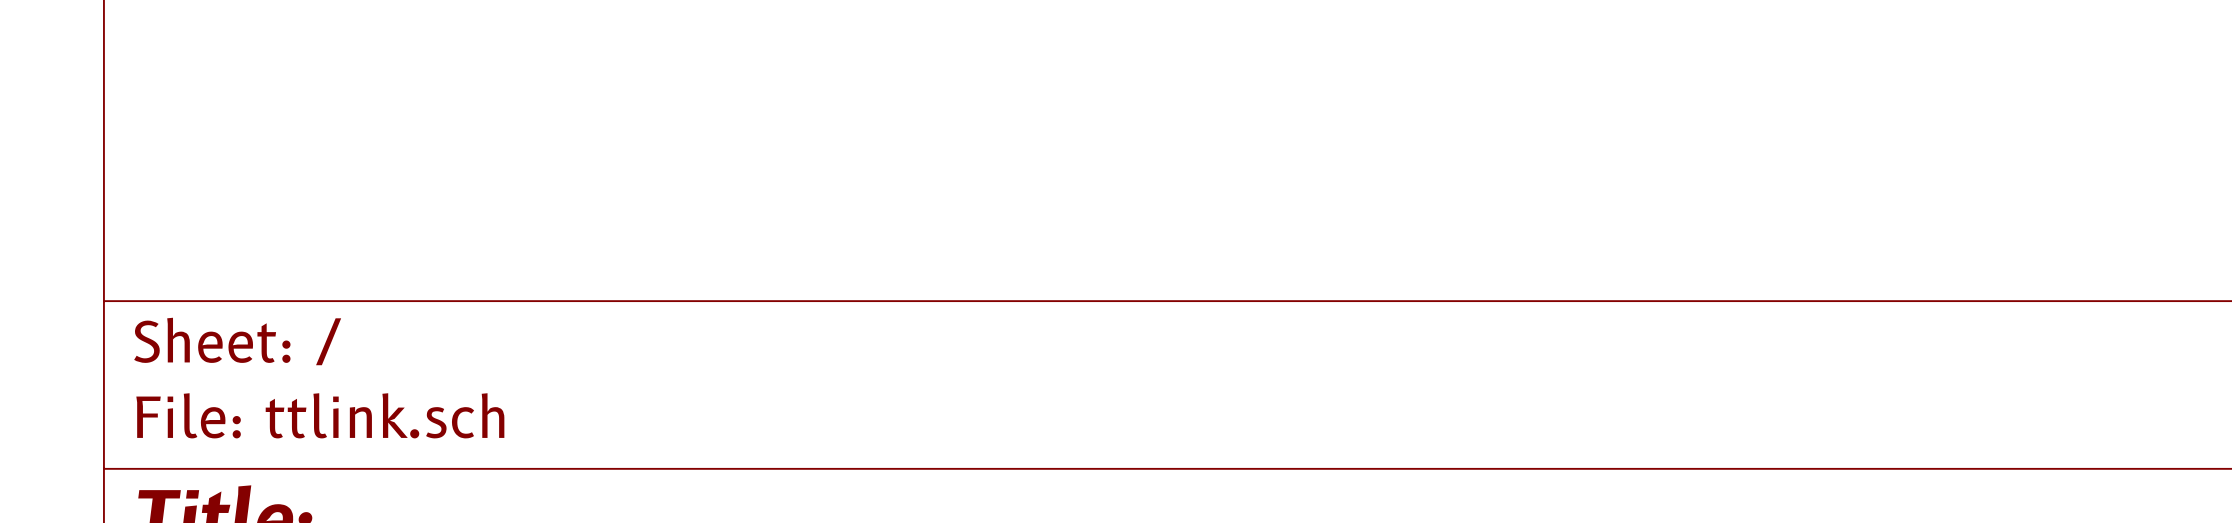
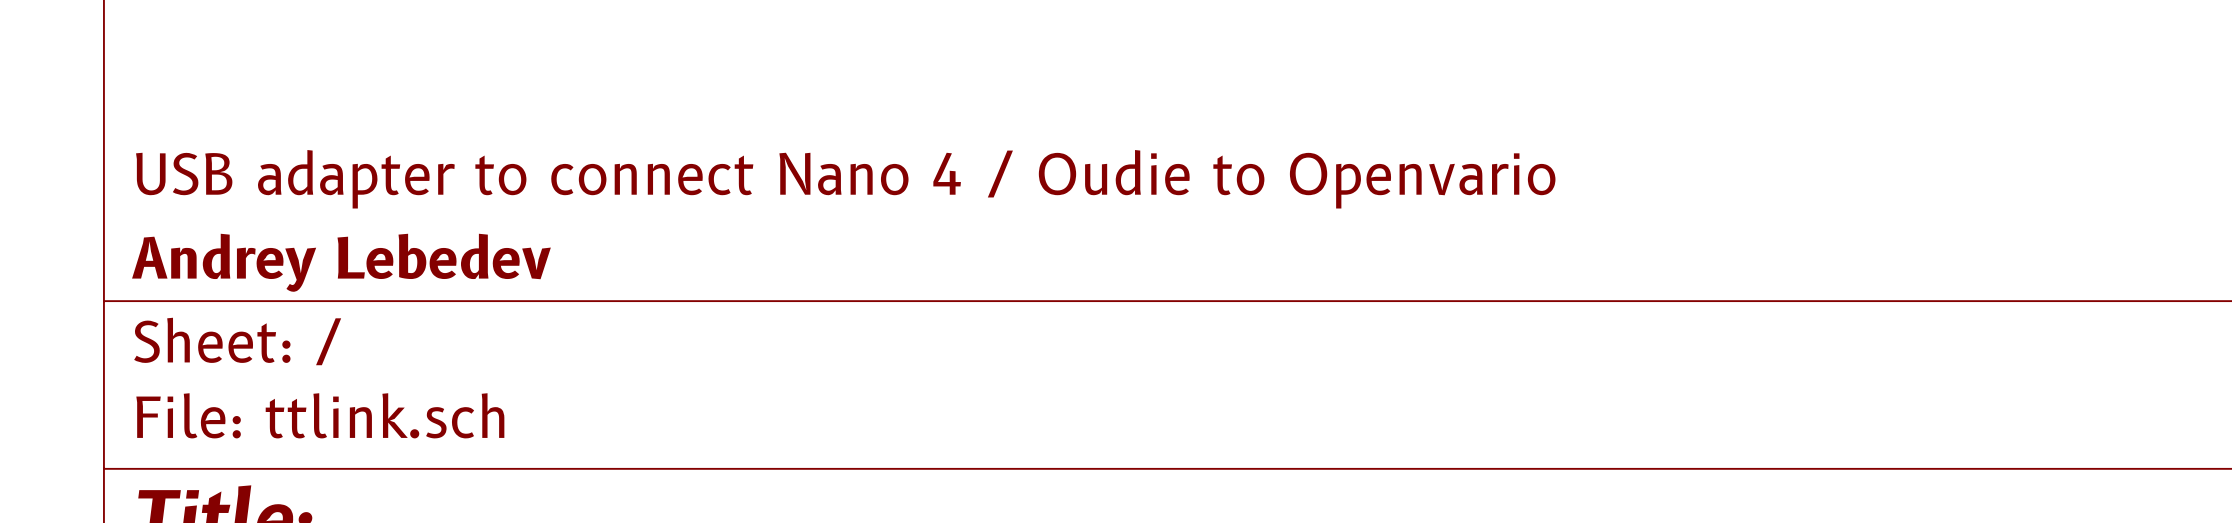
title block: none -> USB adapter to connect Nano 4 / Oudie to Openvario (845, 179)
title block: none -> Andrey Lebedev (341, 262)

